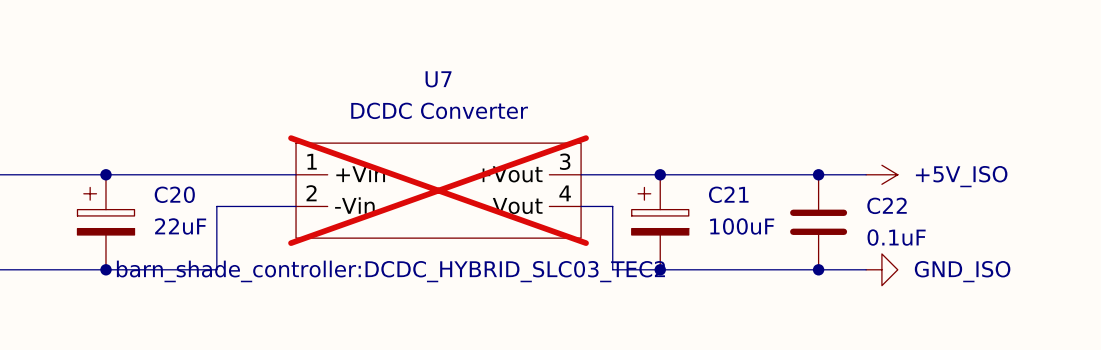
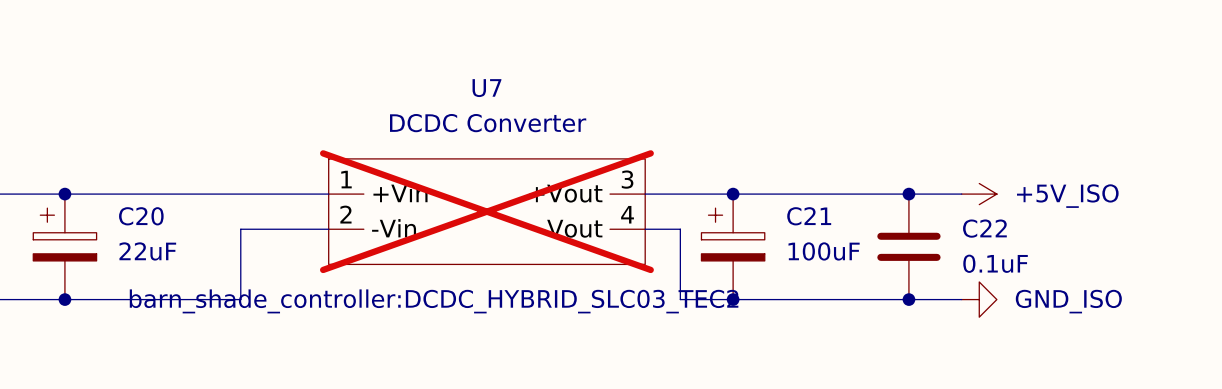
junction position: (105, 174) -> (64, 194)
C20 position: (105, 222) -> (64, 246)
junction position: (105, 269) -> (64, 299)

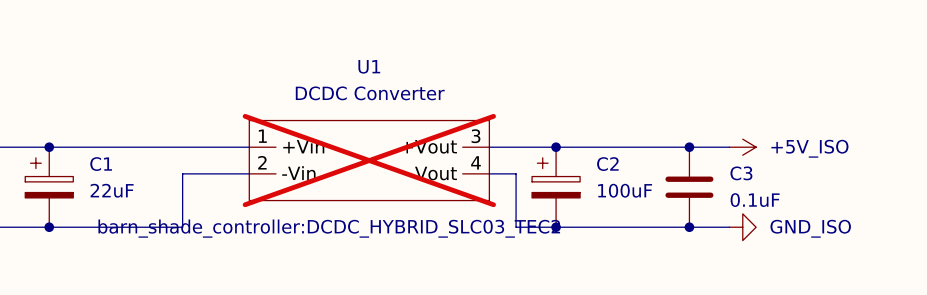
U7 name: U7 (486, 88) -> U1 (369, 66)
C20 name: C20 (141, 216) -> C1 (101, 164)
C21 name: C21 (809, 216) -> C2 (607, 164)
C22 name: C22 (984, 228) -> C3 (741, 173)

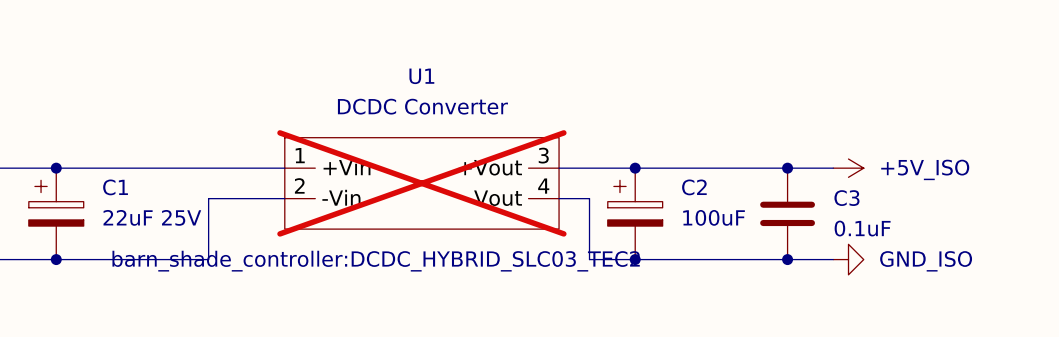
C1 value: 22uF (112, 190) -> 22uF 25V (152, 217)

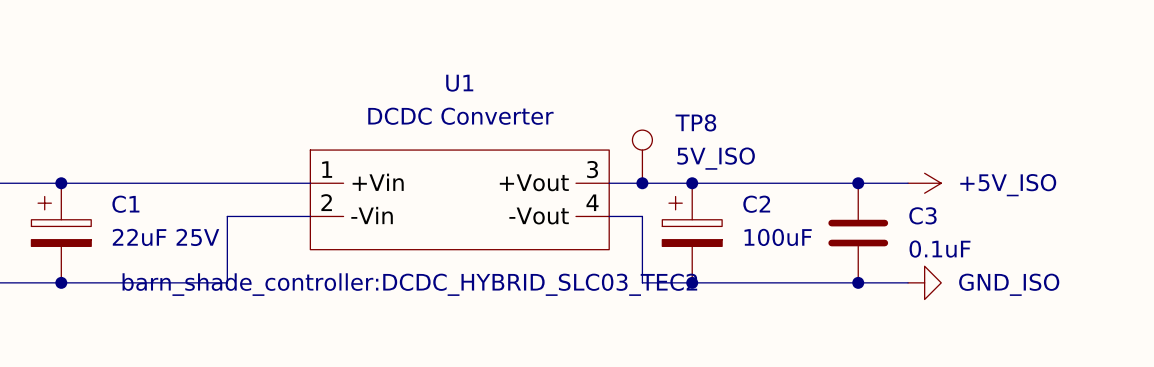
TP8: none -> 5V_ISO (642, 156)
junction: none -> (642, 183)
U1 do-not-place cross: (421, 183) -> none

